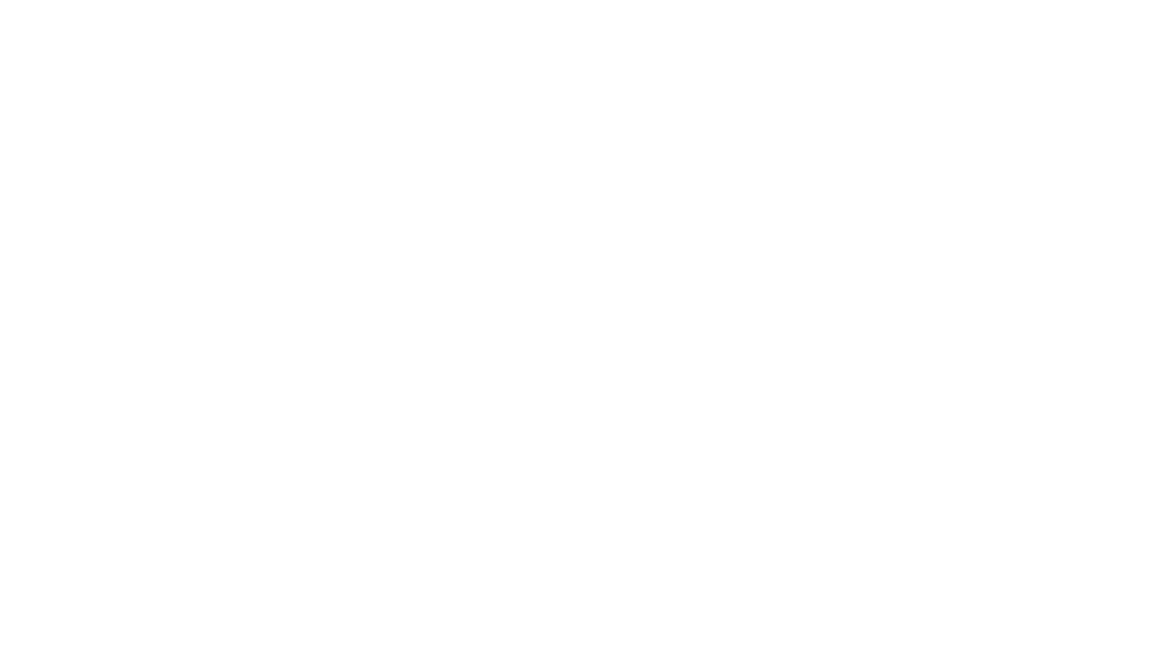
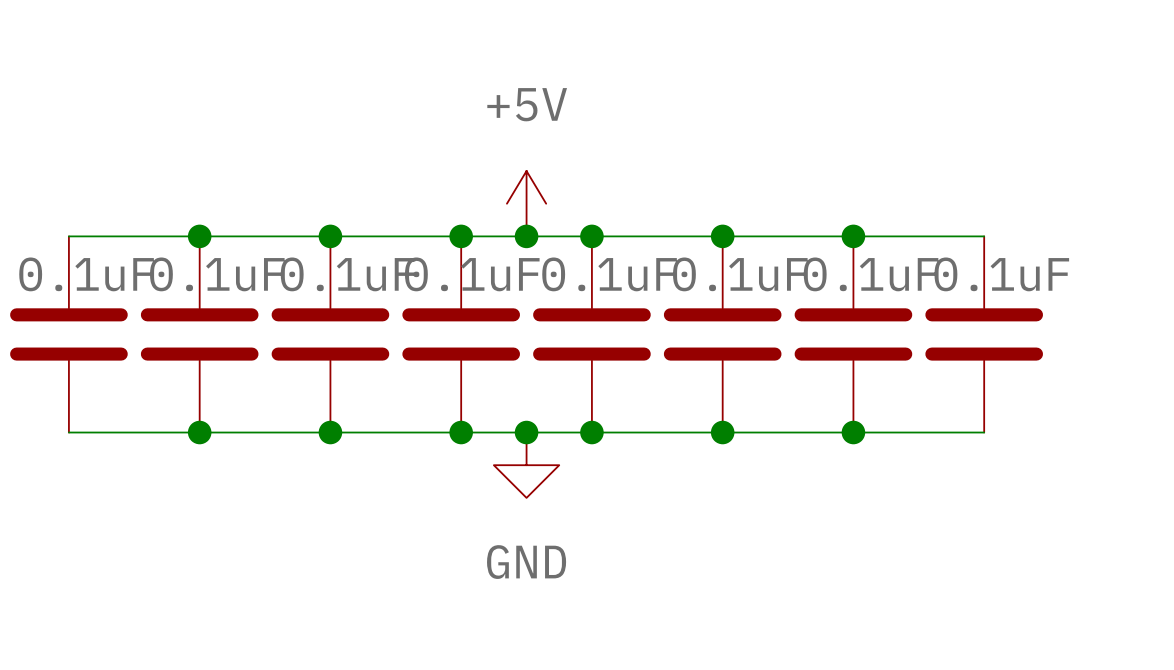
power symbol: none -> +5V (526, 203)
wire: none -> (68, 236) (984, 236)
junction: none -> (199, 236)
junction: none -> (330, 236)
junction: none -> (461, 236)
junction: none -> (526, 236)
junction: none -> (591, 236)
junction: none -> (722, 236)
junction: none -> (853, 236)
part: none -> 0.1uF (68, 334)
part: none -> 0.1uF (199, 334)
part: none -> 0.1uF (330, 334)
part: none -> 0.1uF (461, 334)
part: none -> 0.1uF (591, 334)
part: none -> 0.1uF (722, 334)
part: none -> 0.1uF (853, 334)
part: none -> 0.1uF (984, 334)
wire: none -> (68, 432) (984, 432)
junction: none -> (199, 432)
junction: none -> (330, 432)
junction: none -> (461, 432)
junction: none -> (526, 432)
junction: none -> (591, 432)
junction: none -> (722, 432)
junction: none -> (853, 432)
power symbol: none -> GND (526, 465)

